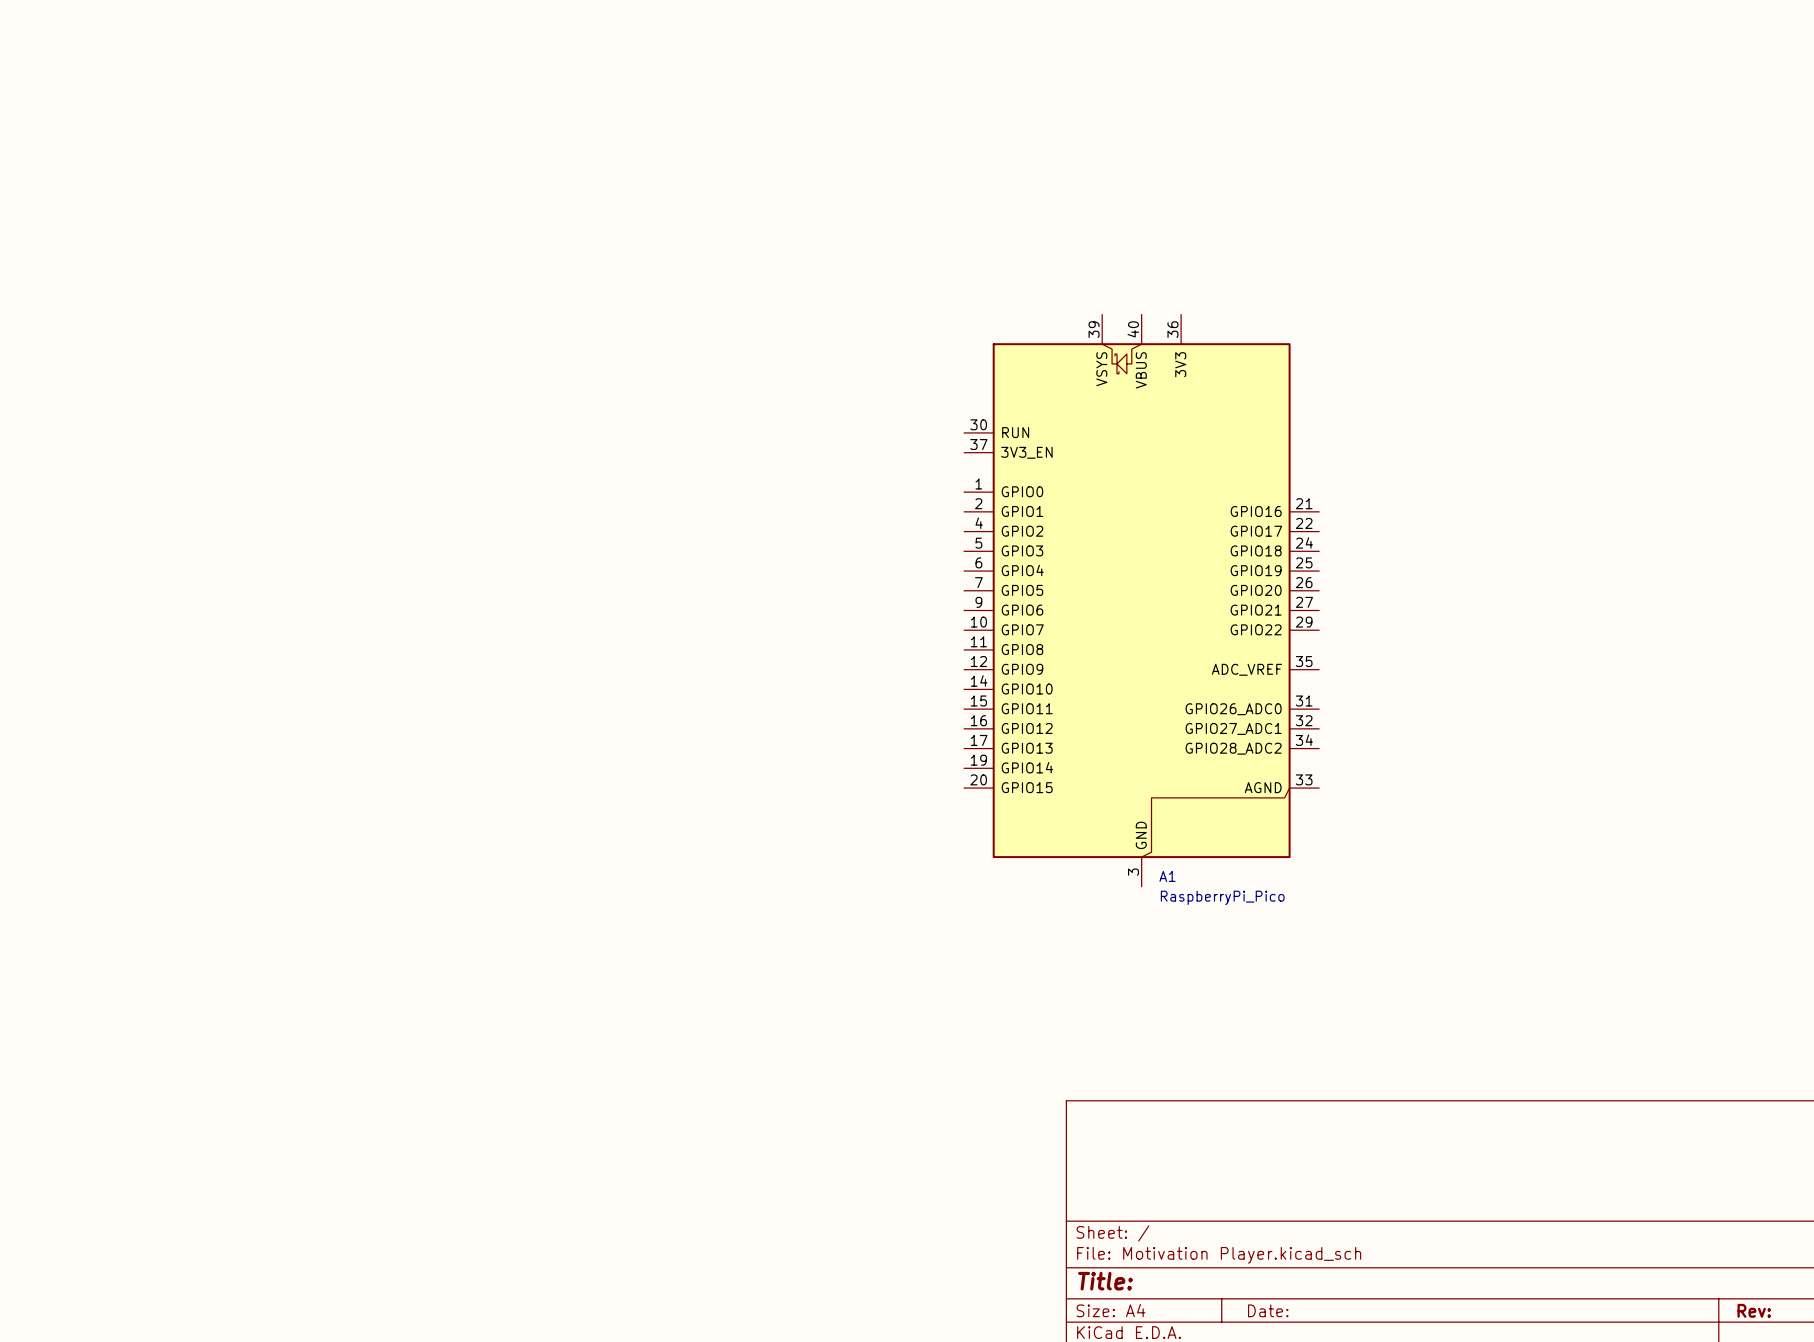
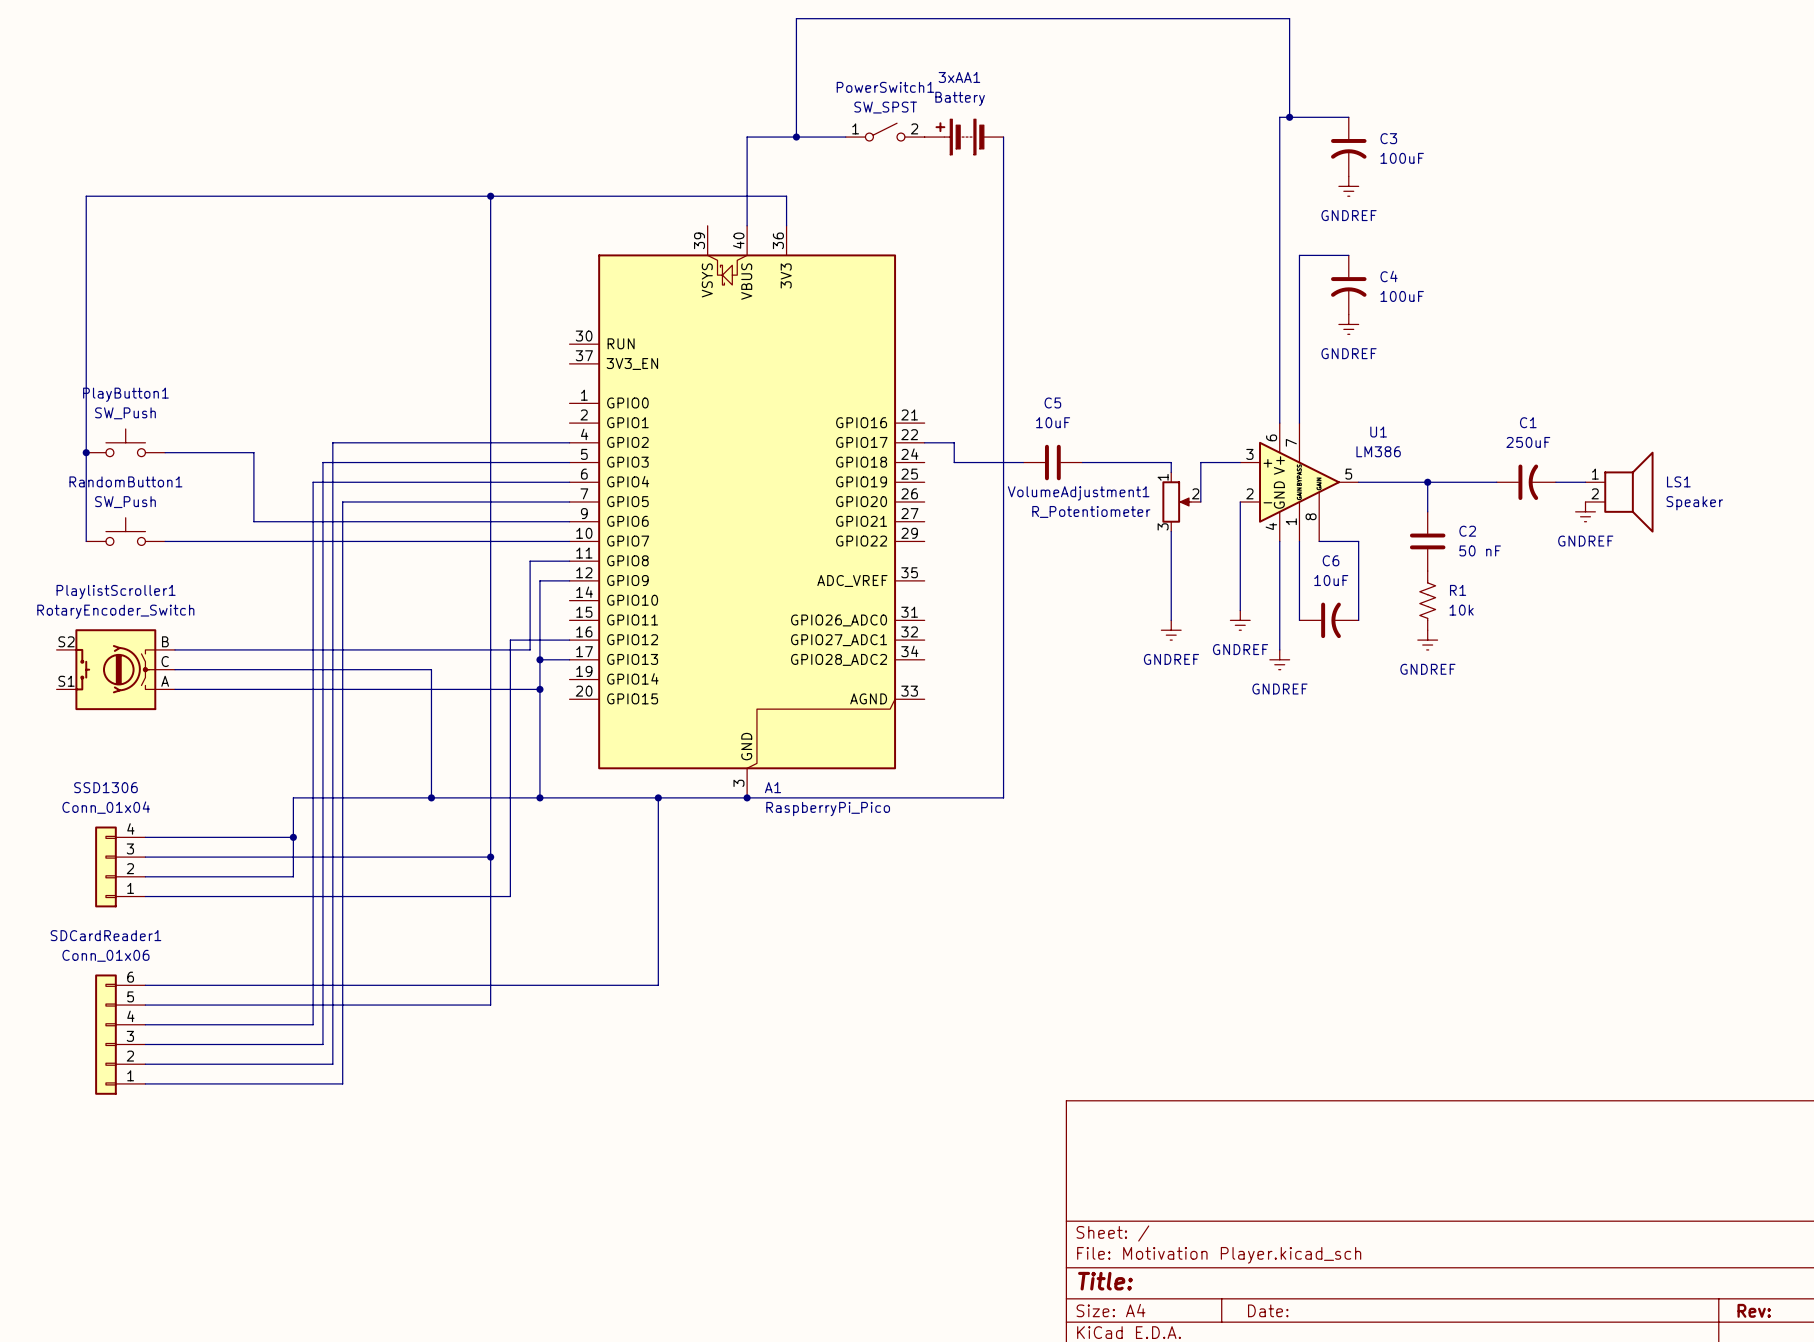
wire: none -> (1289, 117) (1289, 18) (796, 18) (796, 137)
junction: none -> (1289, 117)
wire: none -> (1348, 117) (1279, 117) (1279, 423)
PowerSwitch1: none -> SW_SPST (885, 132)
junction: none -> (796, 137)
wire: none -> (845, 137) (747, 137) (747, 225)
3xAA1: none -> Battery (964, 137)
wire: none -> (1003, 137) (1003, 797) (293, 797) (293, 876) (145, 876)
C3: none -> 100uF (1348, 146)
power symbol: none -> GNDREF (1348, 186)
wire: none -> (490, 196) (490, 1005) (145, 1005)
junction: none -> (490, 196)
wire: none -> (786, 225) (786, 196) (86, 196) (86, 541)
wire: none -> (1348, 255) (1299, 255) (1299, 423)
C4: none -> 100uF (1348, 284)
power symbol: none -> GNDREF (1348, 324)
PlayButton1: none -> SW_Push (125, 442)
wire: none -> (569, 442) (332, 442) (332, 1064) (145, 1064)
wire: none -> (924, 442) (954, 442) (954, 462) (1023, 462)
junction: none -> (86, 452)
wire: none -> (165, 452) (253, 452) (253, 521) (569, 521)
wire: none -> (569, 462) (322, 462) (322, 1044) (145, 1044)
C5: none -> 10uF (1052, 462)
wire: none -> (569, 482) (313, 482) (313, 1024) (145, 1024)
U1: none -> LM386 (1299, 482)
wire: none -> (1358, 482) (1496, 482)
wire: none -> (1427, 482) (1427, 511)
junction: none -> (1427, 482)
C1: none -> 250uF (1526, 482)
wire: none -> (1555, 482) (1585, 482)
LS1: none -> Speaker (1619, 492)
wire: none -> (569, 501) (342, 501) (342, 1083) (145, 1083)
VolumeAdjustment1: none -> R_Potentiometer (1181, 501)
power symbol: none -> GNDREF (1585, 511)
RandomButton1: none -> SW_Push (125, 531)
wire: none -> (165, 541) (569, 541)
wire: none -> (1299, 541) (1299, 620)
wire: none -> (1319, 541) (1358, 541) (1358, 620)
C2: none -> 50 nF (1427, 541)
wire: none -> (569, 561) (530, 561) (530, 649) (175, 649)
wire: none -> (569, 580) (539, 580) (539, 797)
A1 position: (1141, 600) -> (747, 511)
R1: none -> 10k (1427, 600)
power symbol: none -> GNDREF (1240, 620)
C6: none -> 10uF (1329, 620)
power symbol: none -> GNDREF (1171, 630)
wire: none -> (569, 640) (510, 640) (510, 896) (145, 896)
power symbol: none -> GNDREF (1427, 640)
wire: none -> (539, 659) (569, 659)
junction: none -> (539, 659)
power symbol: none -> GNDREF (1279, 659)
PlaylistScroller1: none -> RotaryEncoder_Switch (115, 669)
wire: none -> (175, 669) (431, 669) (431, 797)
wire: none -> (175, 689) (539, 689)
junction: none -> (539, 689)
junction: none -> (431, 797)
junction: none -> (539, 797)
wire: none -> (658, 797) (658, 985) (145, 985)
junction: none -> (658, 797)
junction: none -> (747, 797)
wire: none -> (145, 837) (293, 837)
junction: none -> (293, 837)
wire: none -> (145, 857) (490, 857)
junction: none -> (490, 857)
SSD1306: none -> Conn_01x04 (120, 866)
SDCardReader1: none -> Conn_01x06 (120, 1034)

